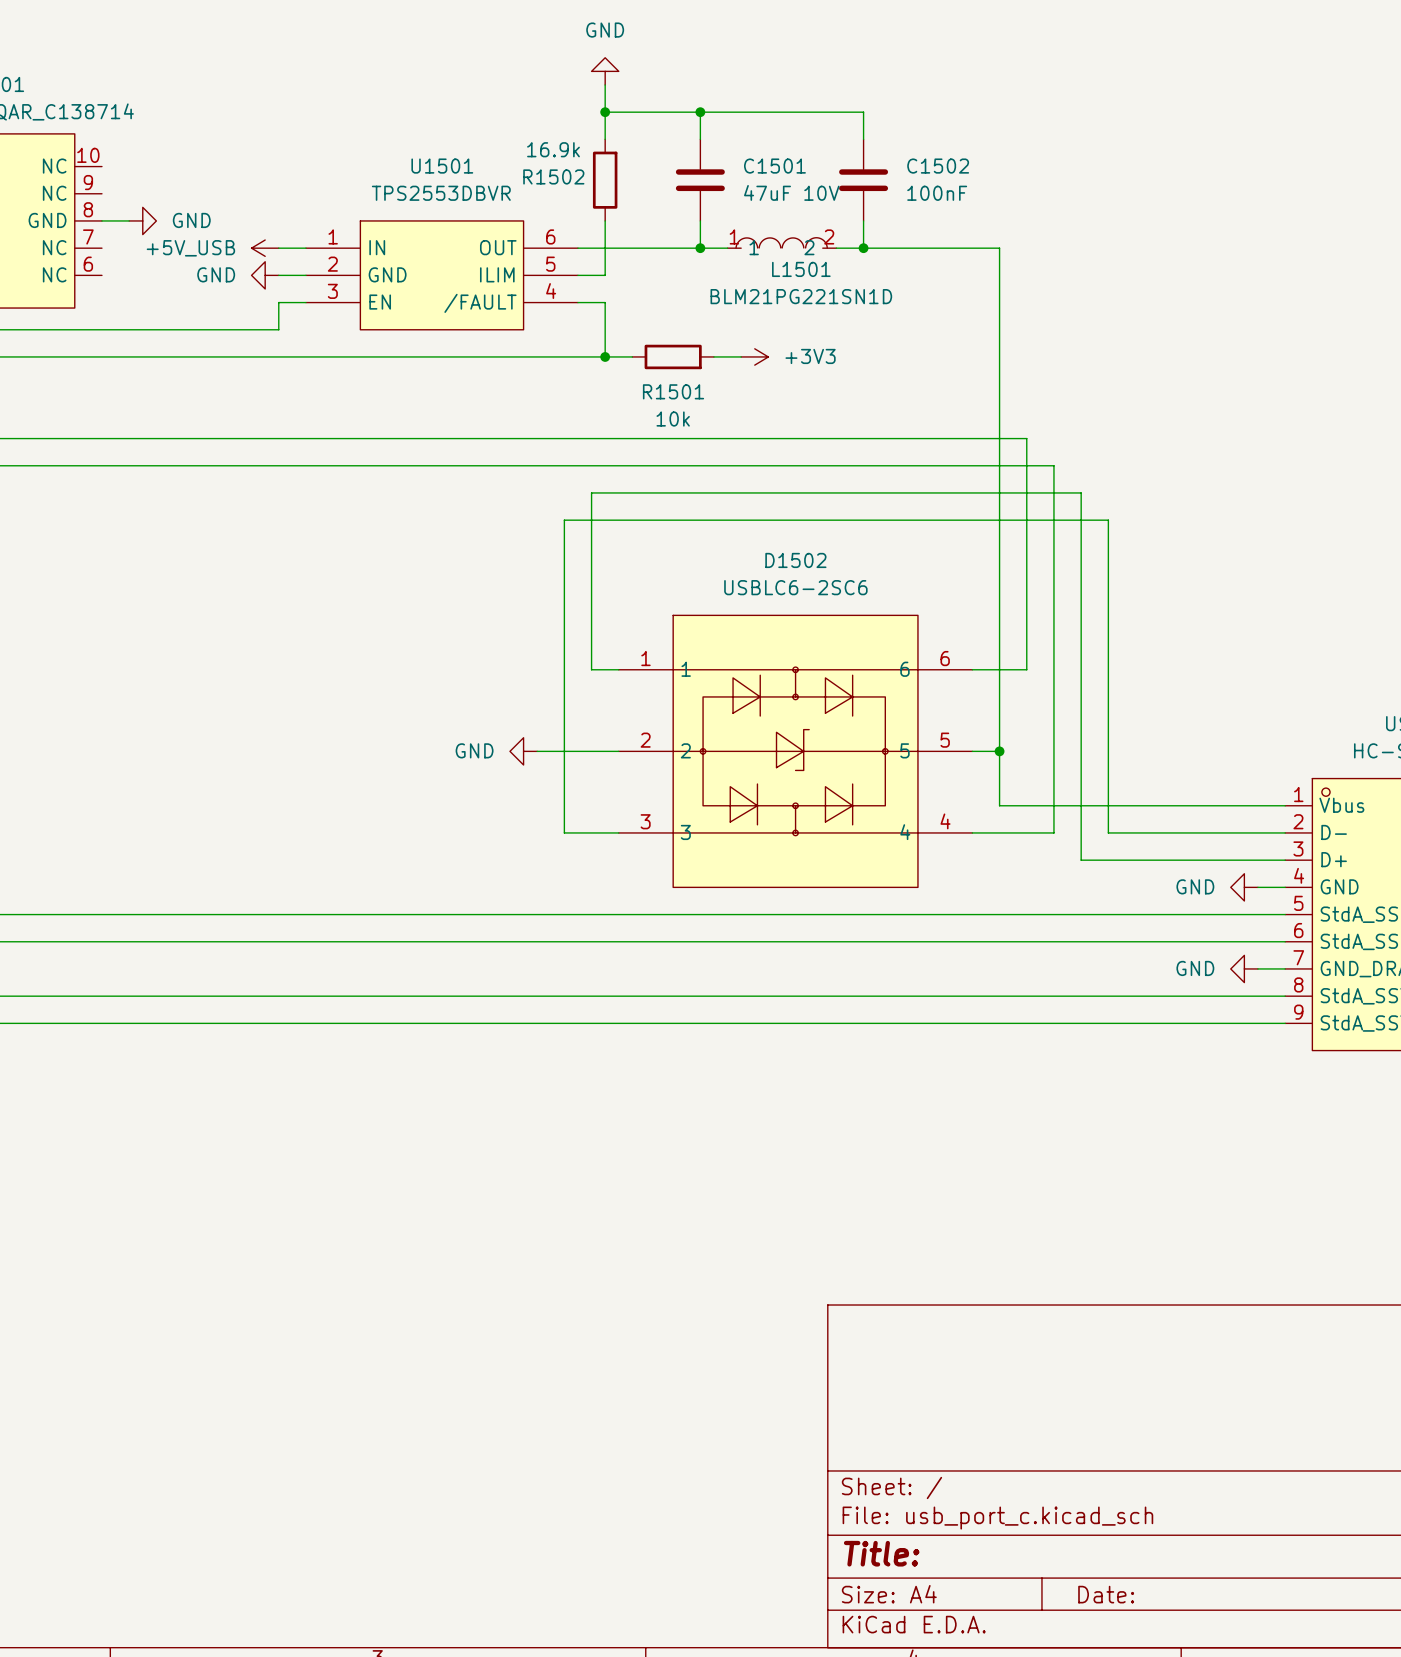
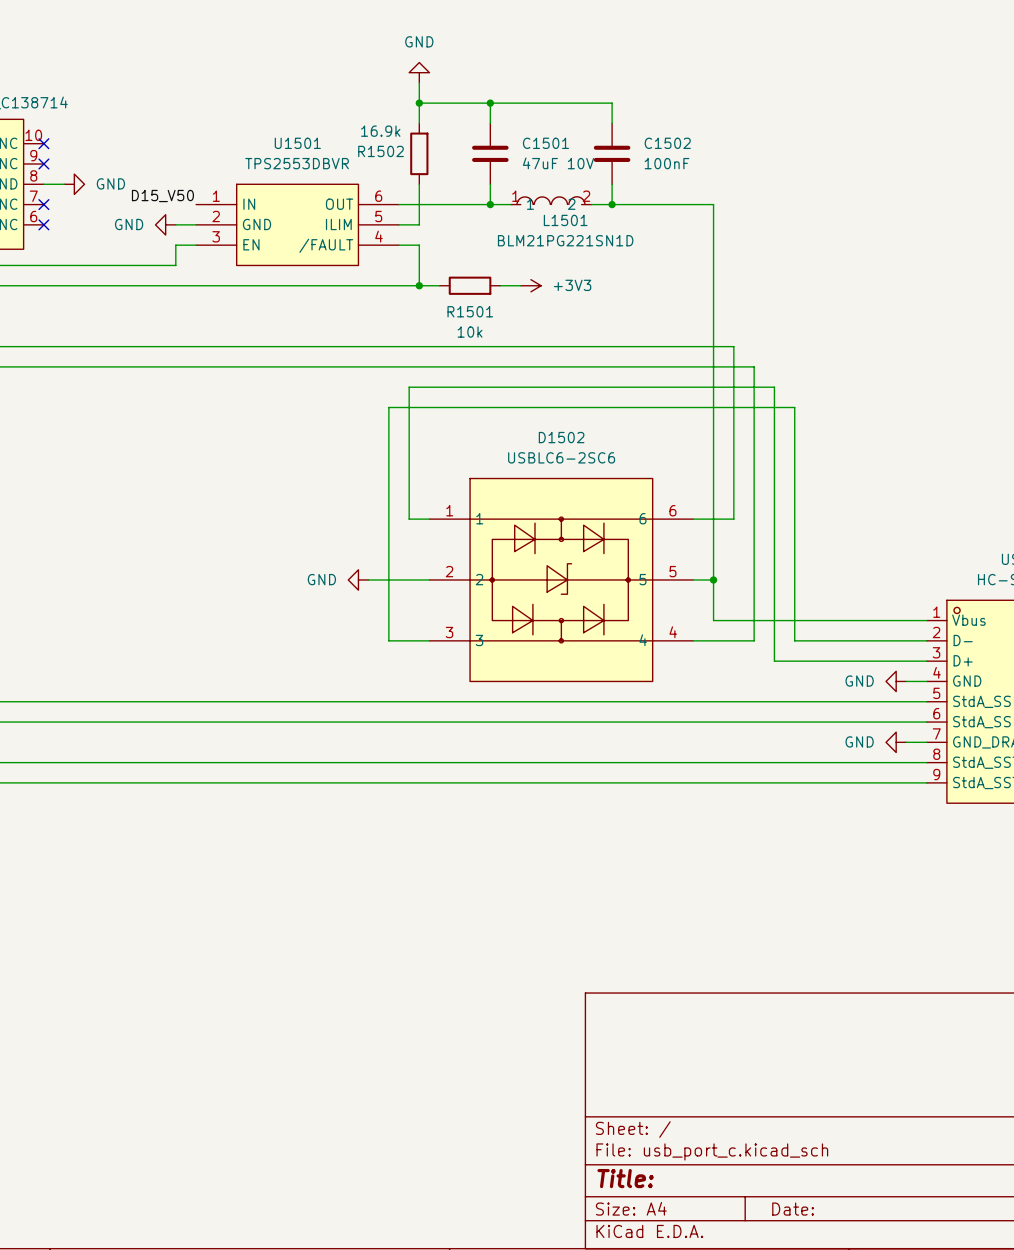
no-connect mark: none -> (43, 143)
no-connect mark: none -> (43, 164)
label: none -> D15_V50 (162, 196)
no-connect mark: none -> (43, 204)
power symbol: +5V_USB (265, 248) -> none
wire: (278, 248) (305, 248) -> none
no-connect mark: none -> (43, 224)

